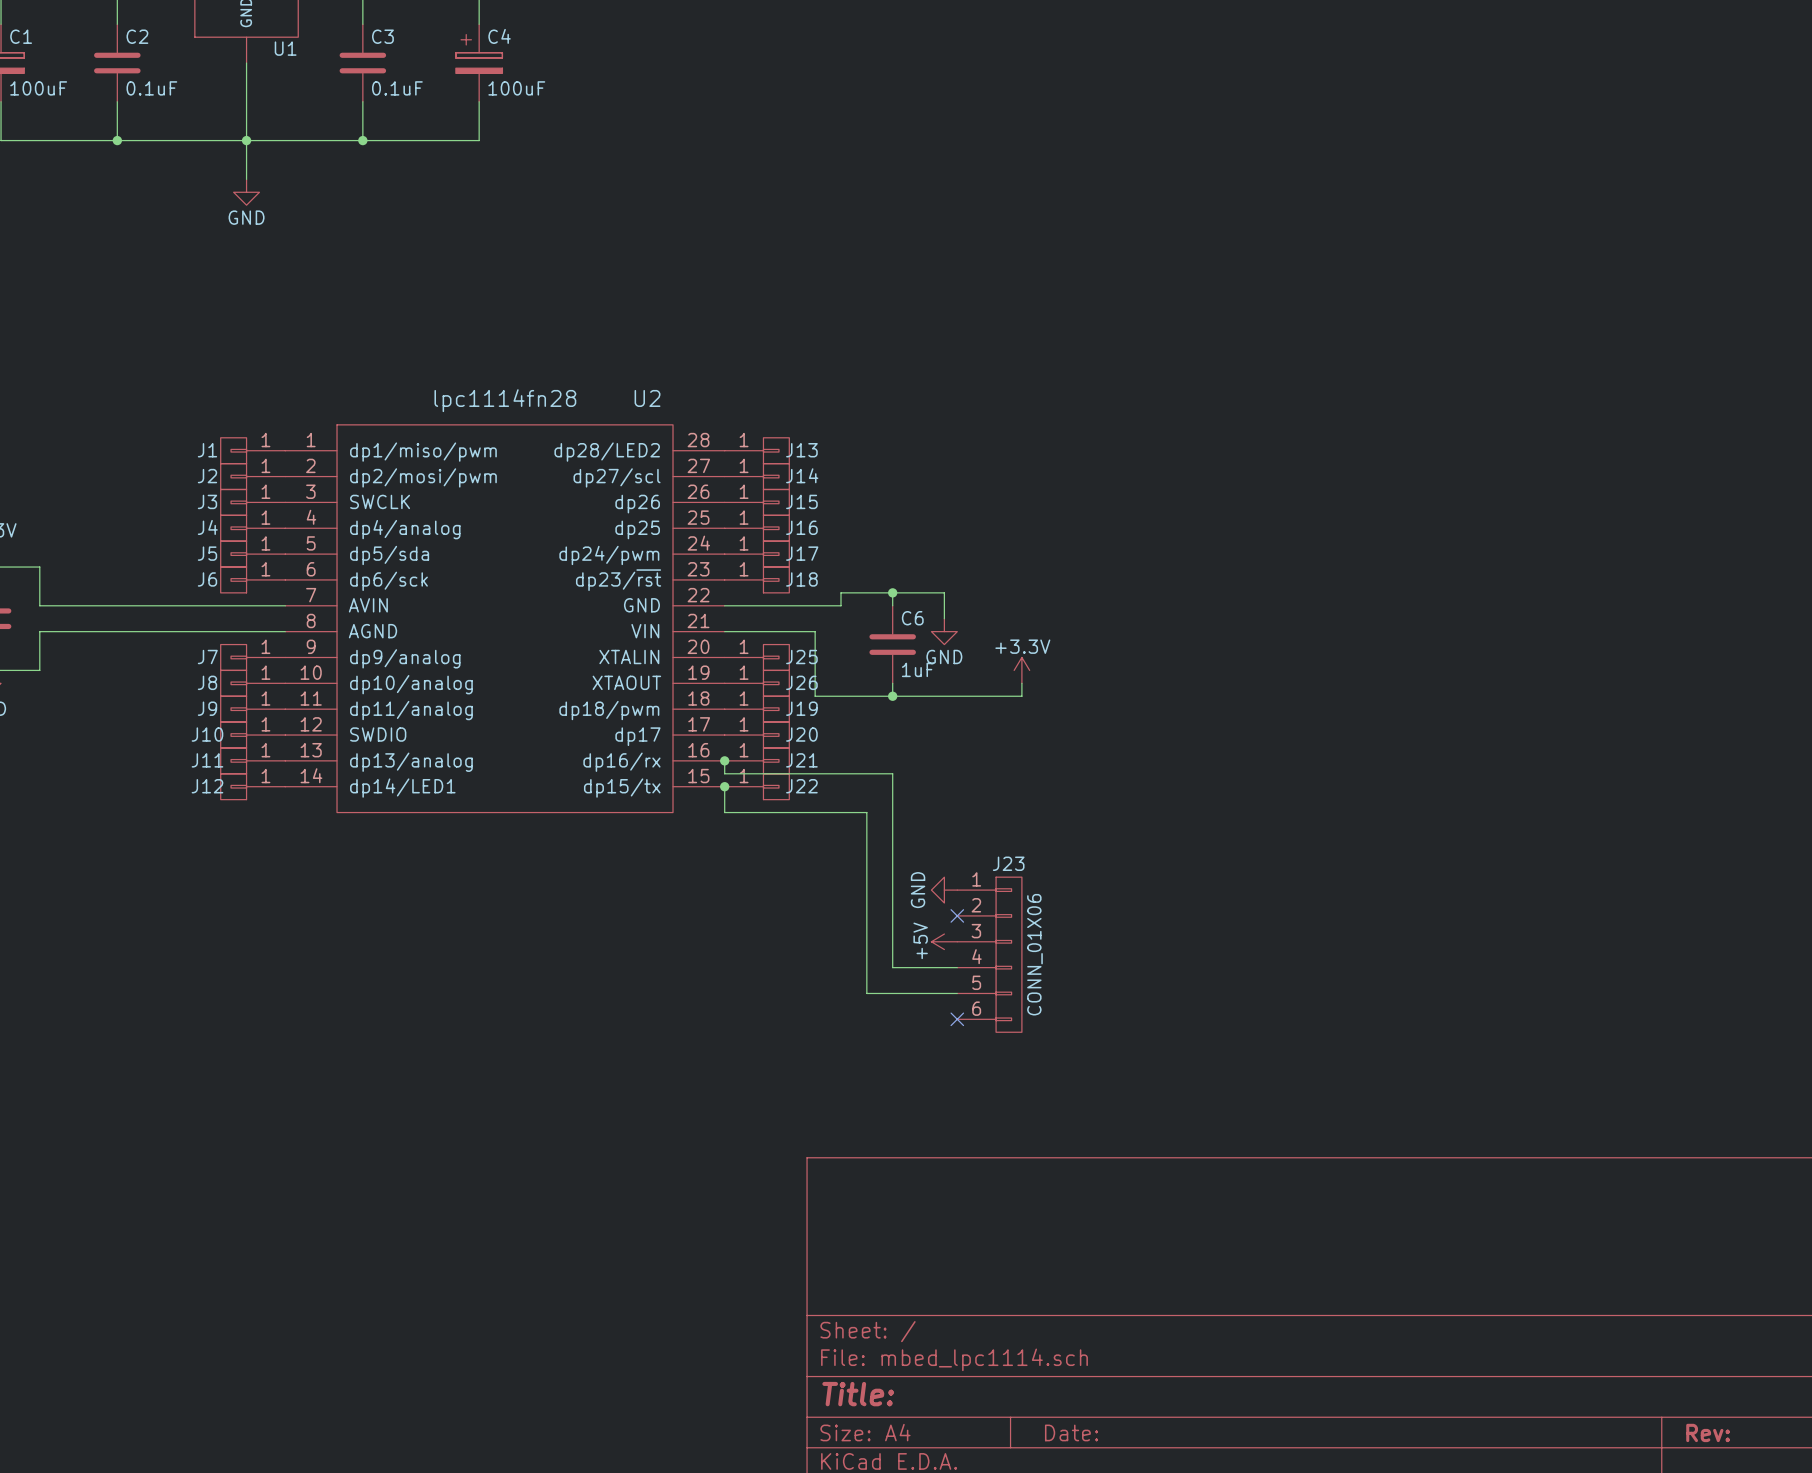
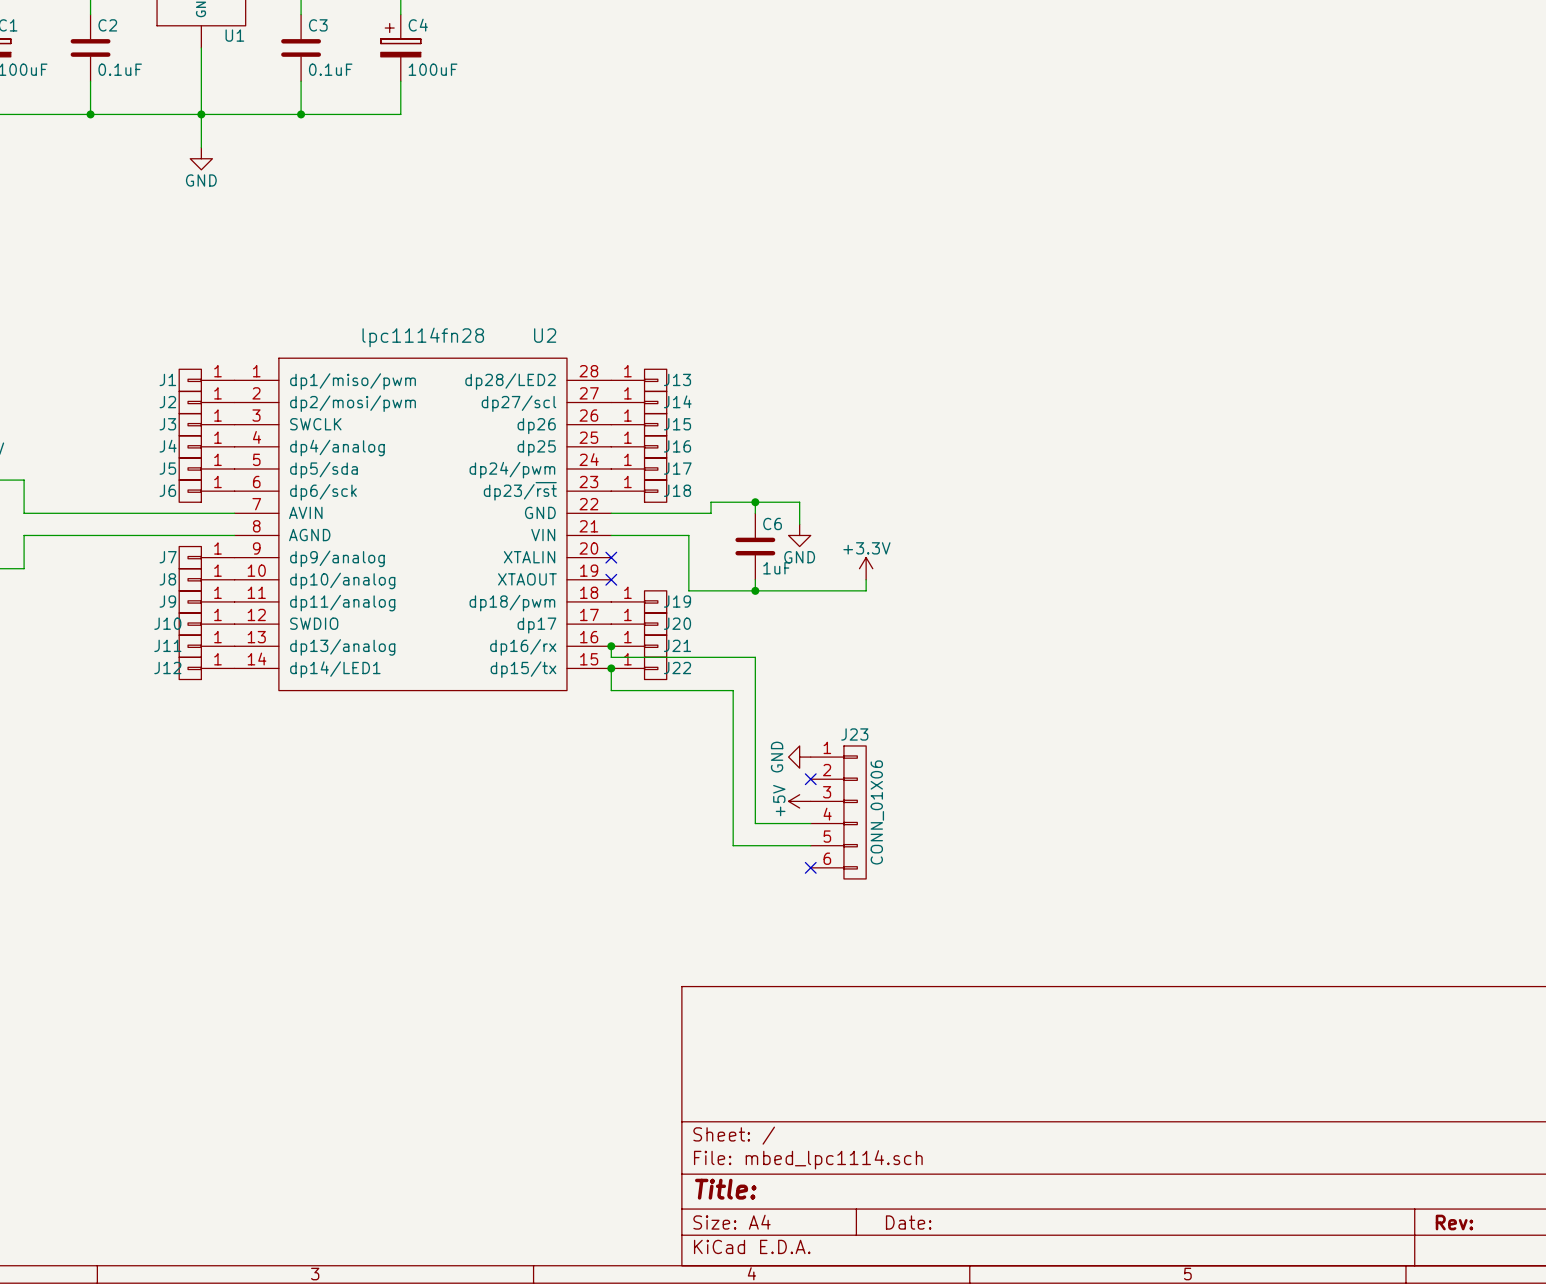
no-connect mark: none -> (611, 557)
J25: (757, 657) -> none
no-connect mark: none -> (611, 579)
J26: (757, 683) -> none

